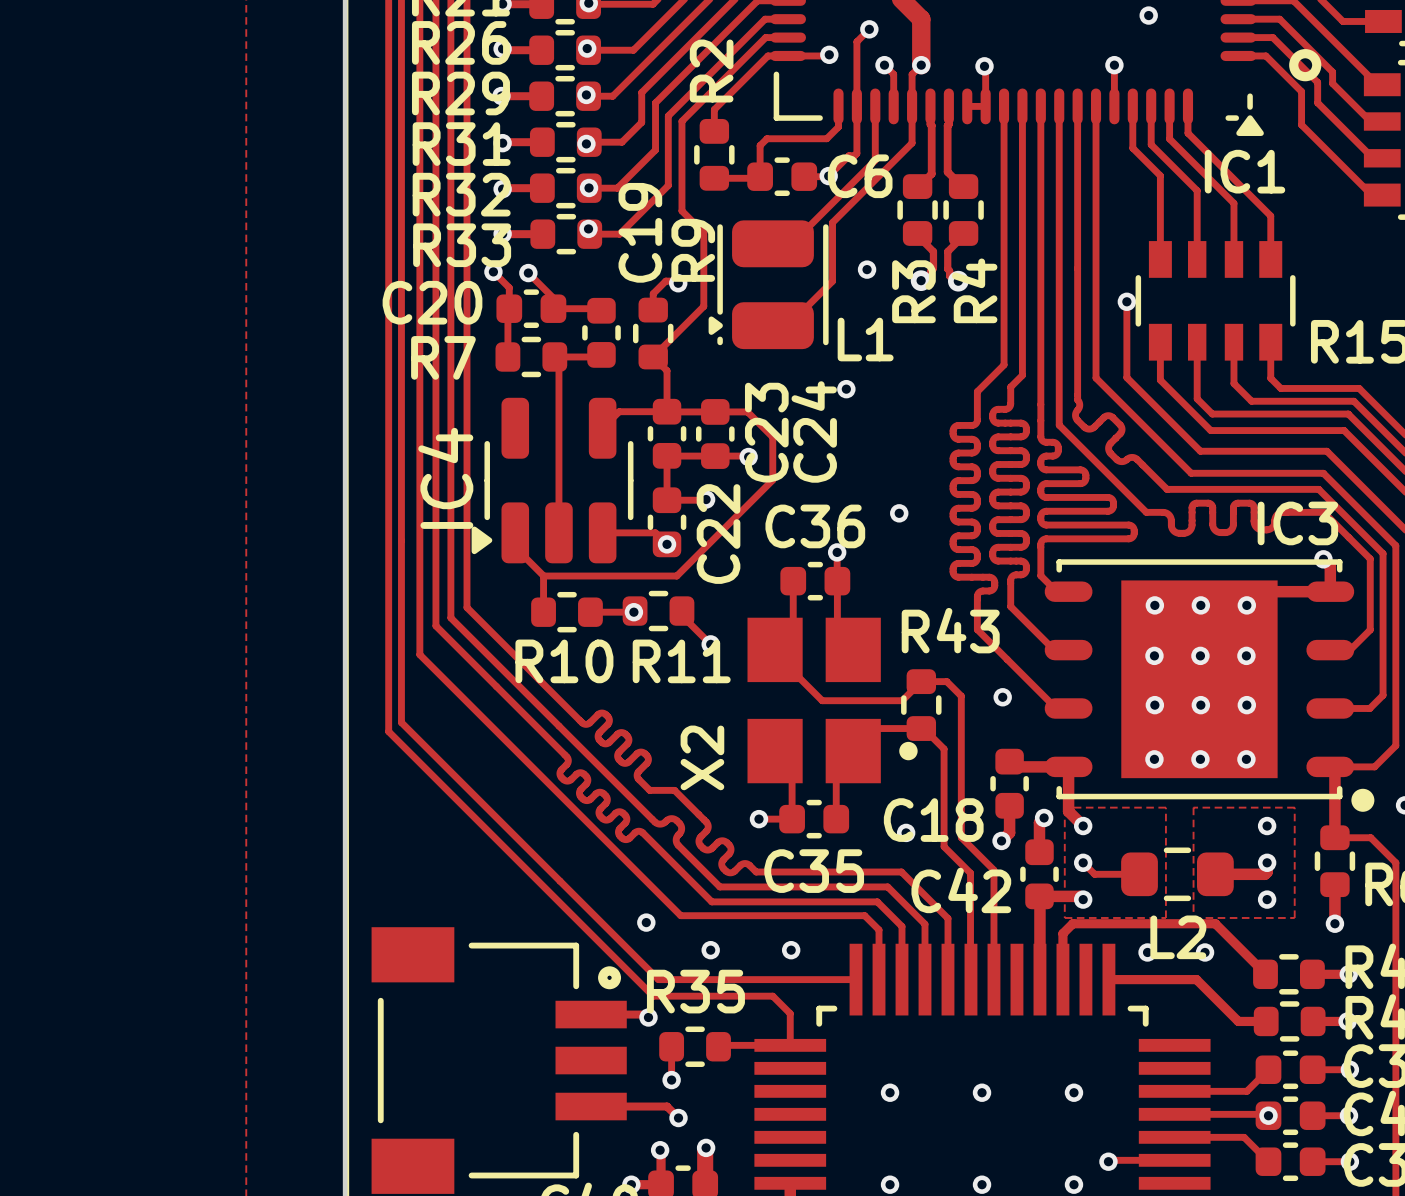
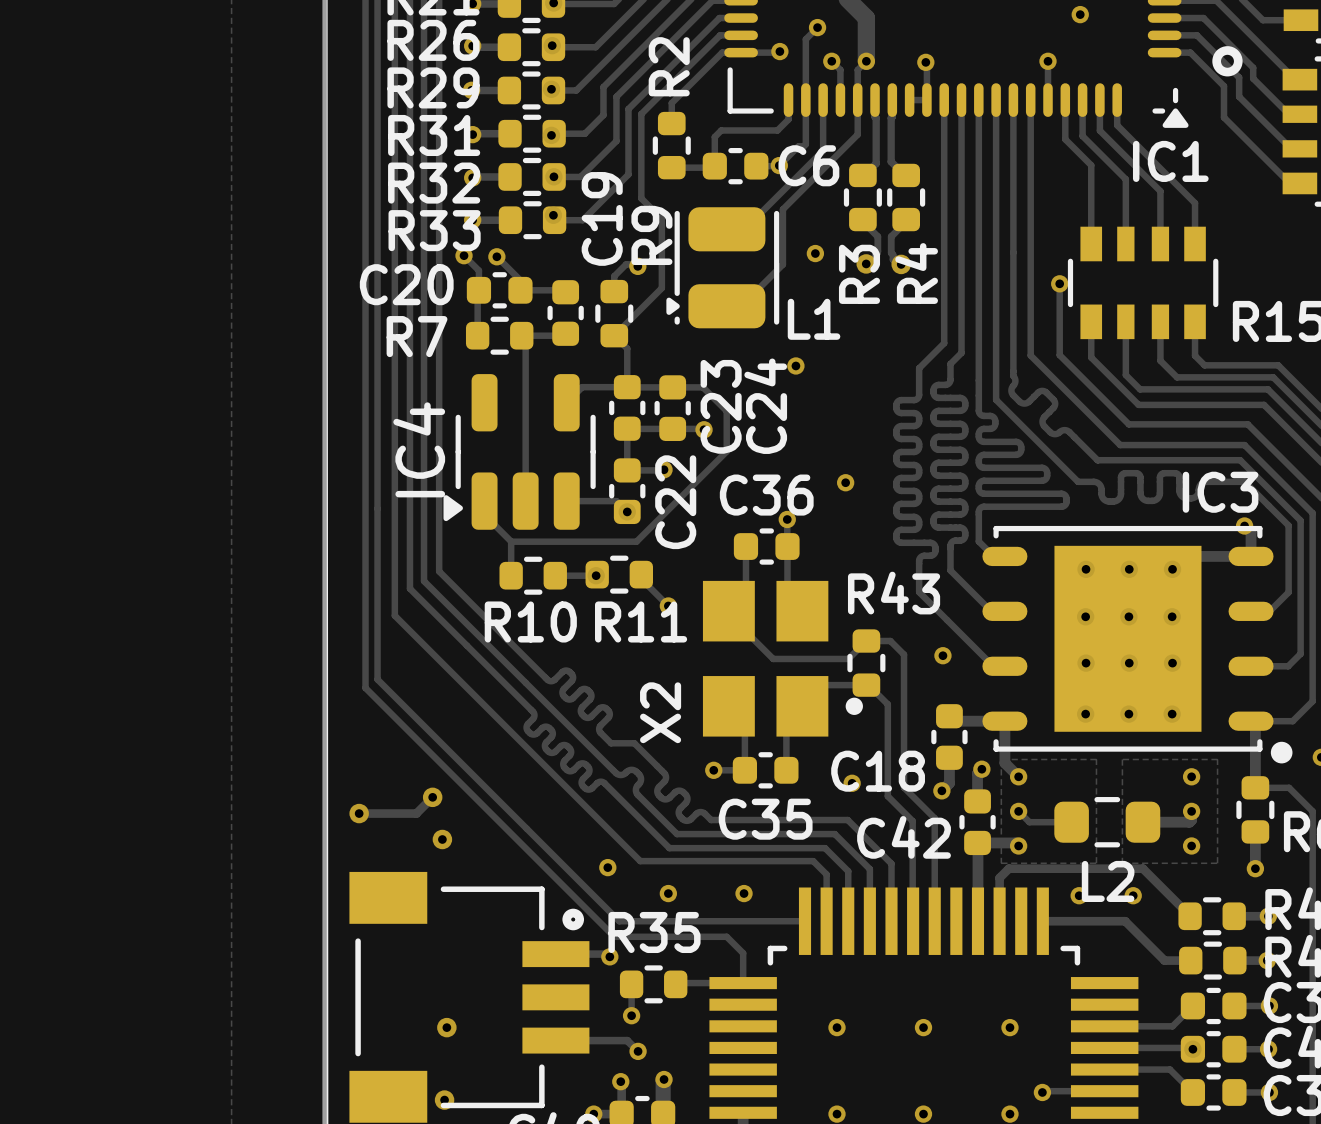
track: none -> (432, 797) (416, 813) (359, 813)
via: none -> (432, 797)
via: none -> (359, 813)
via: none -> (442, 839)
via: none -> (446, 1027)
via: none -> (444, 1100)

